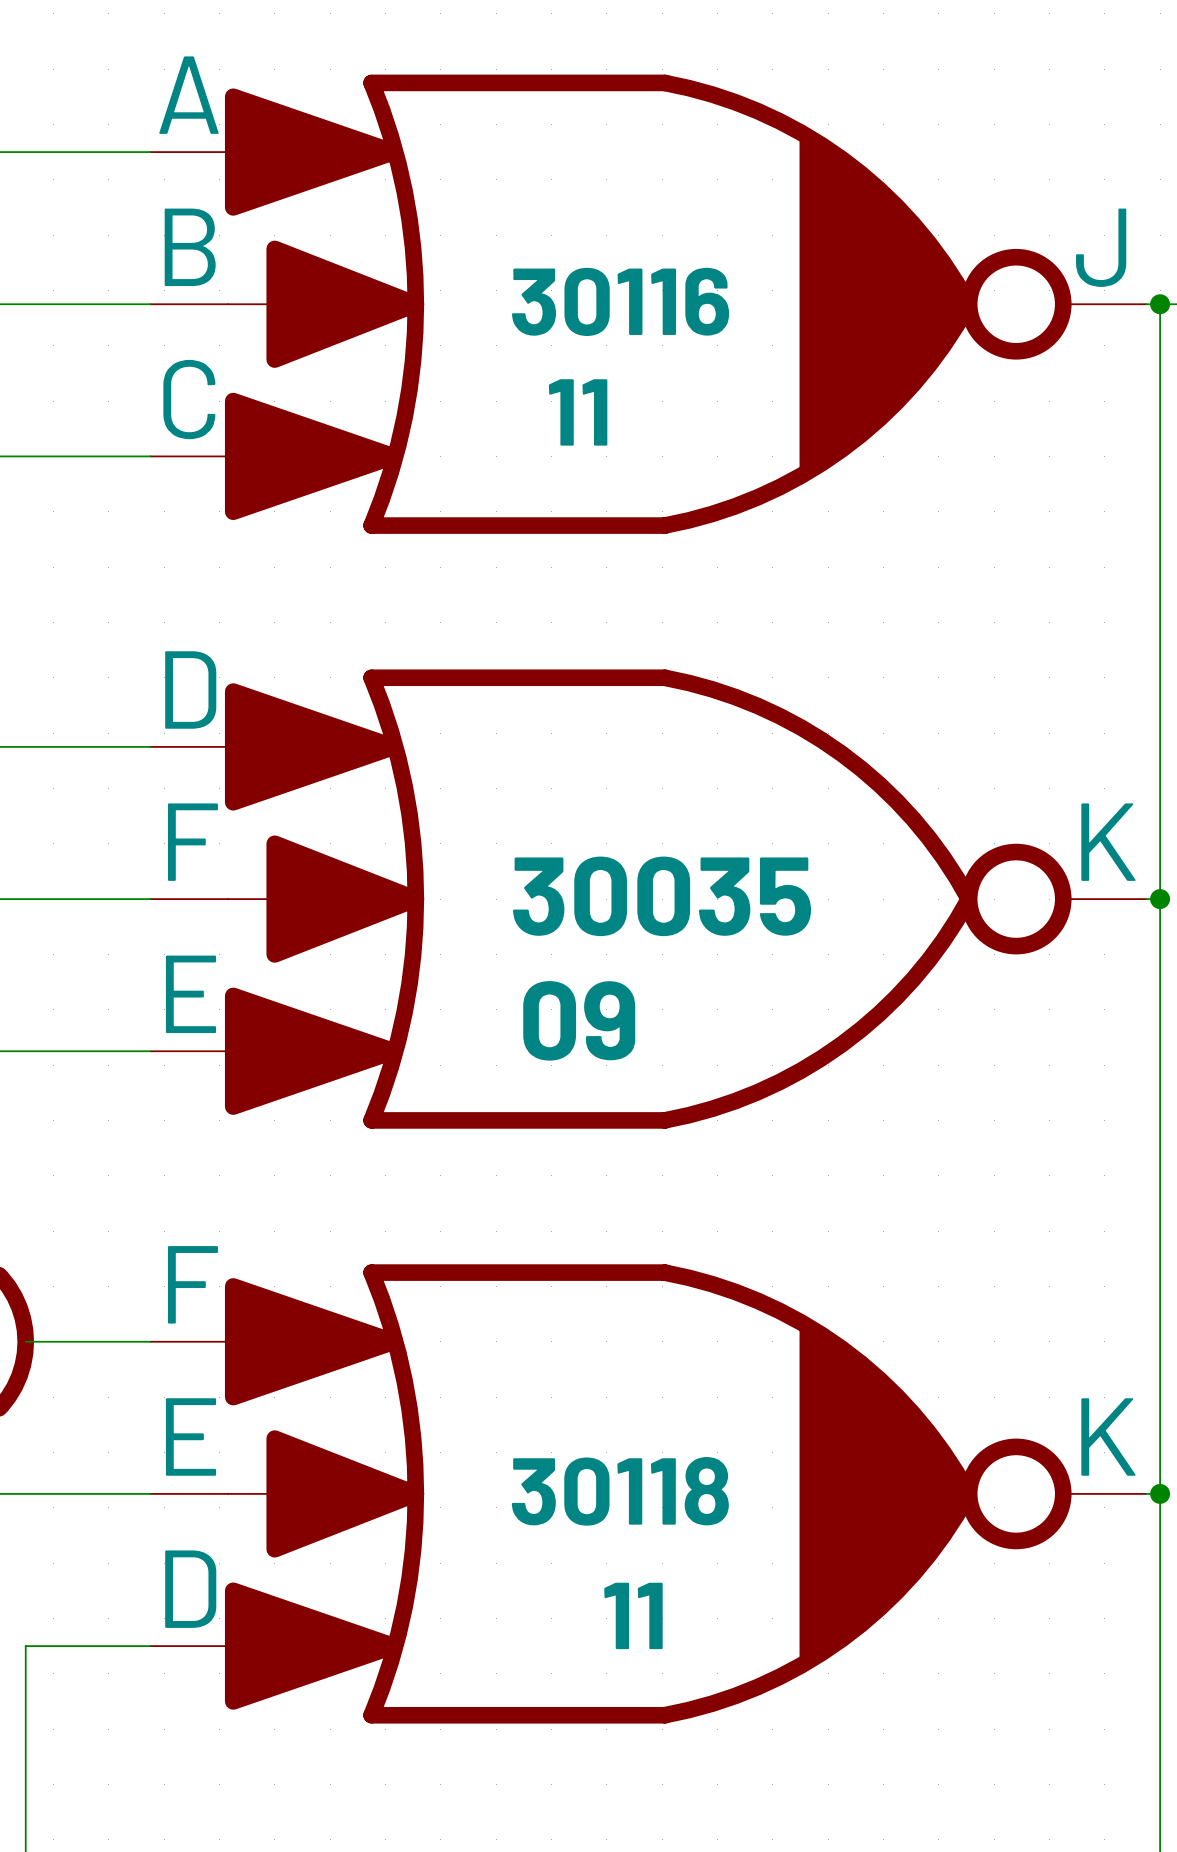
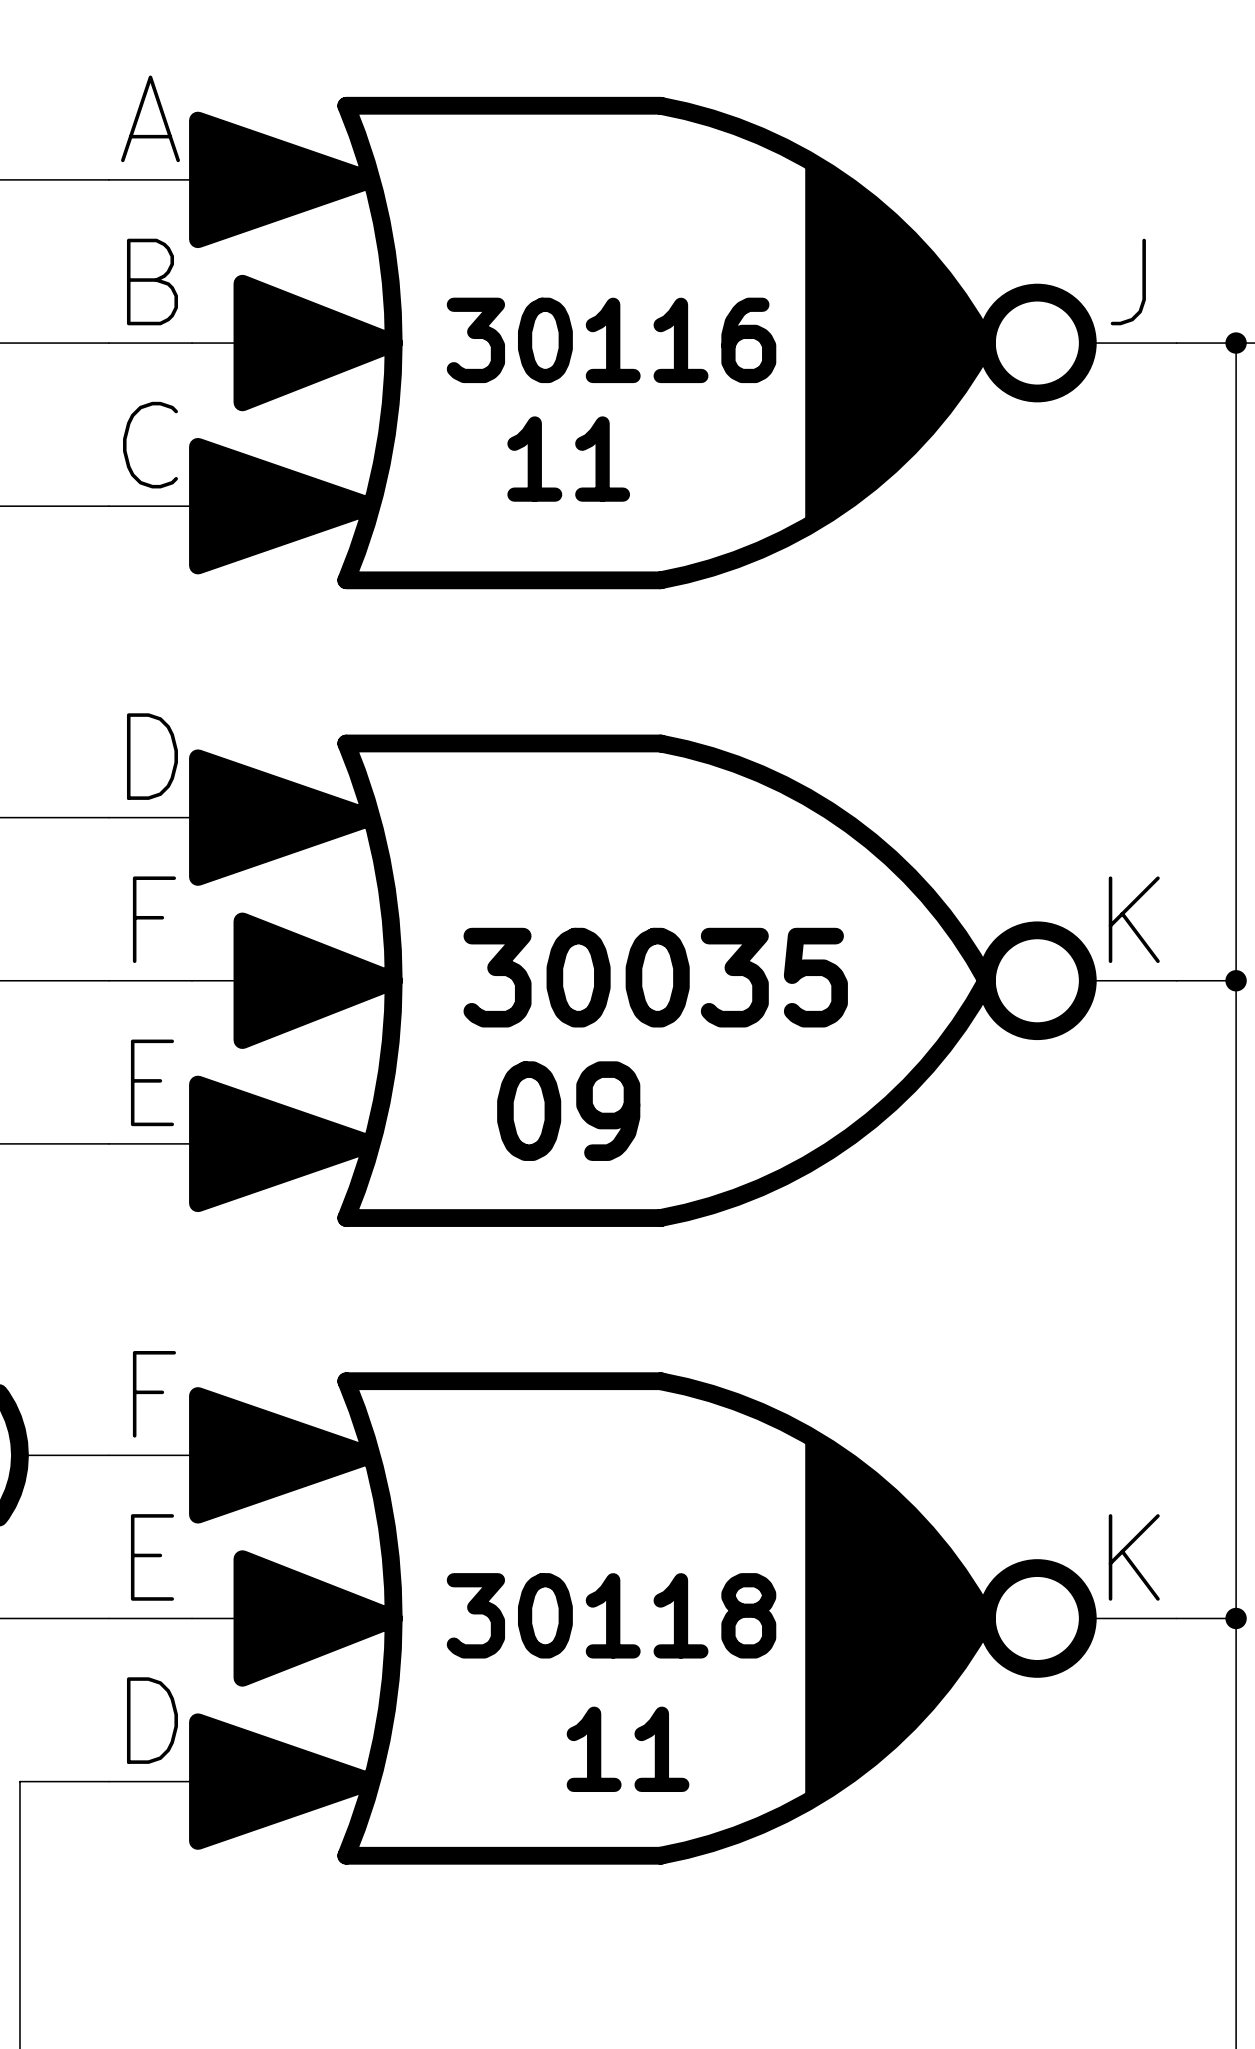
part position: (648, 304) -> (642, 343)
part position: (648, 899) -> (642, 980)
part position: (648, 1493) -> (642, 1618)

